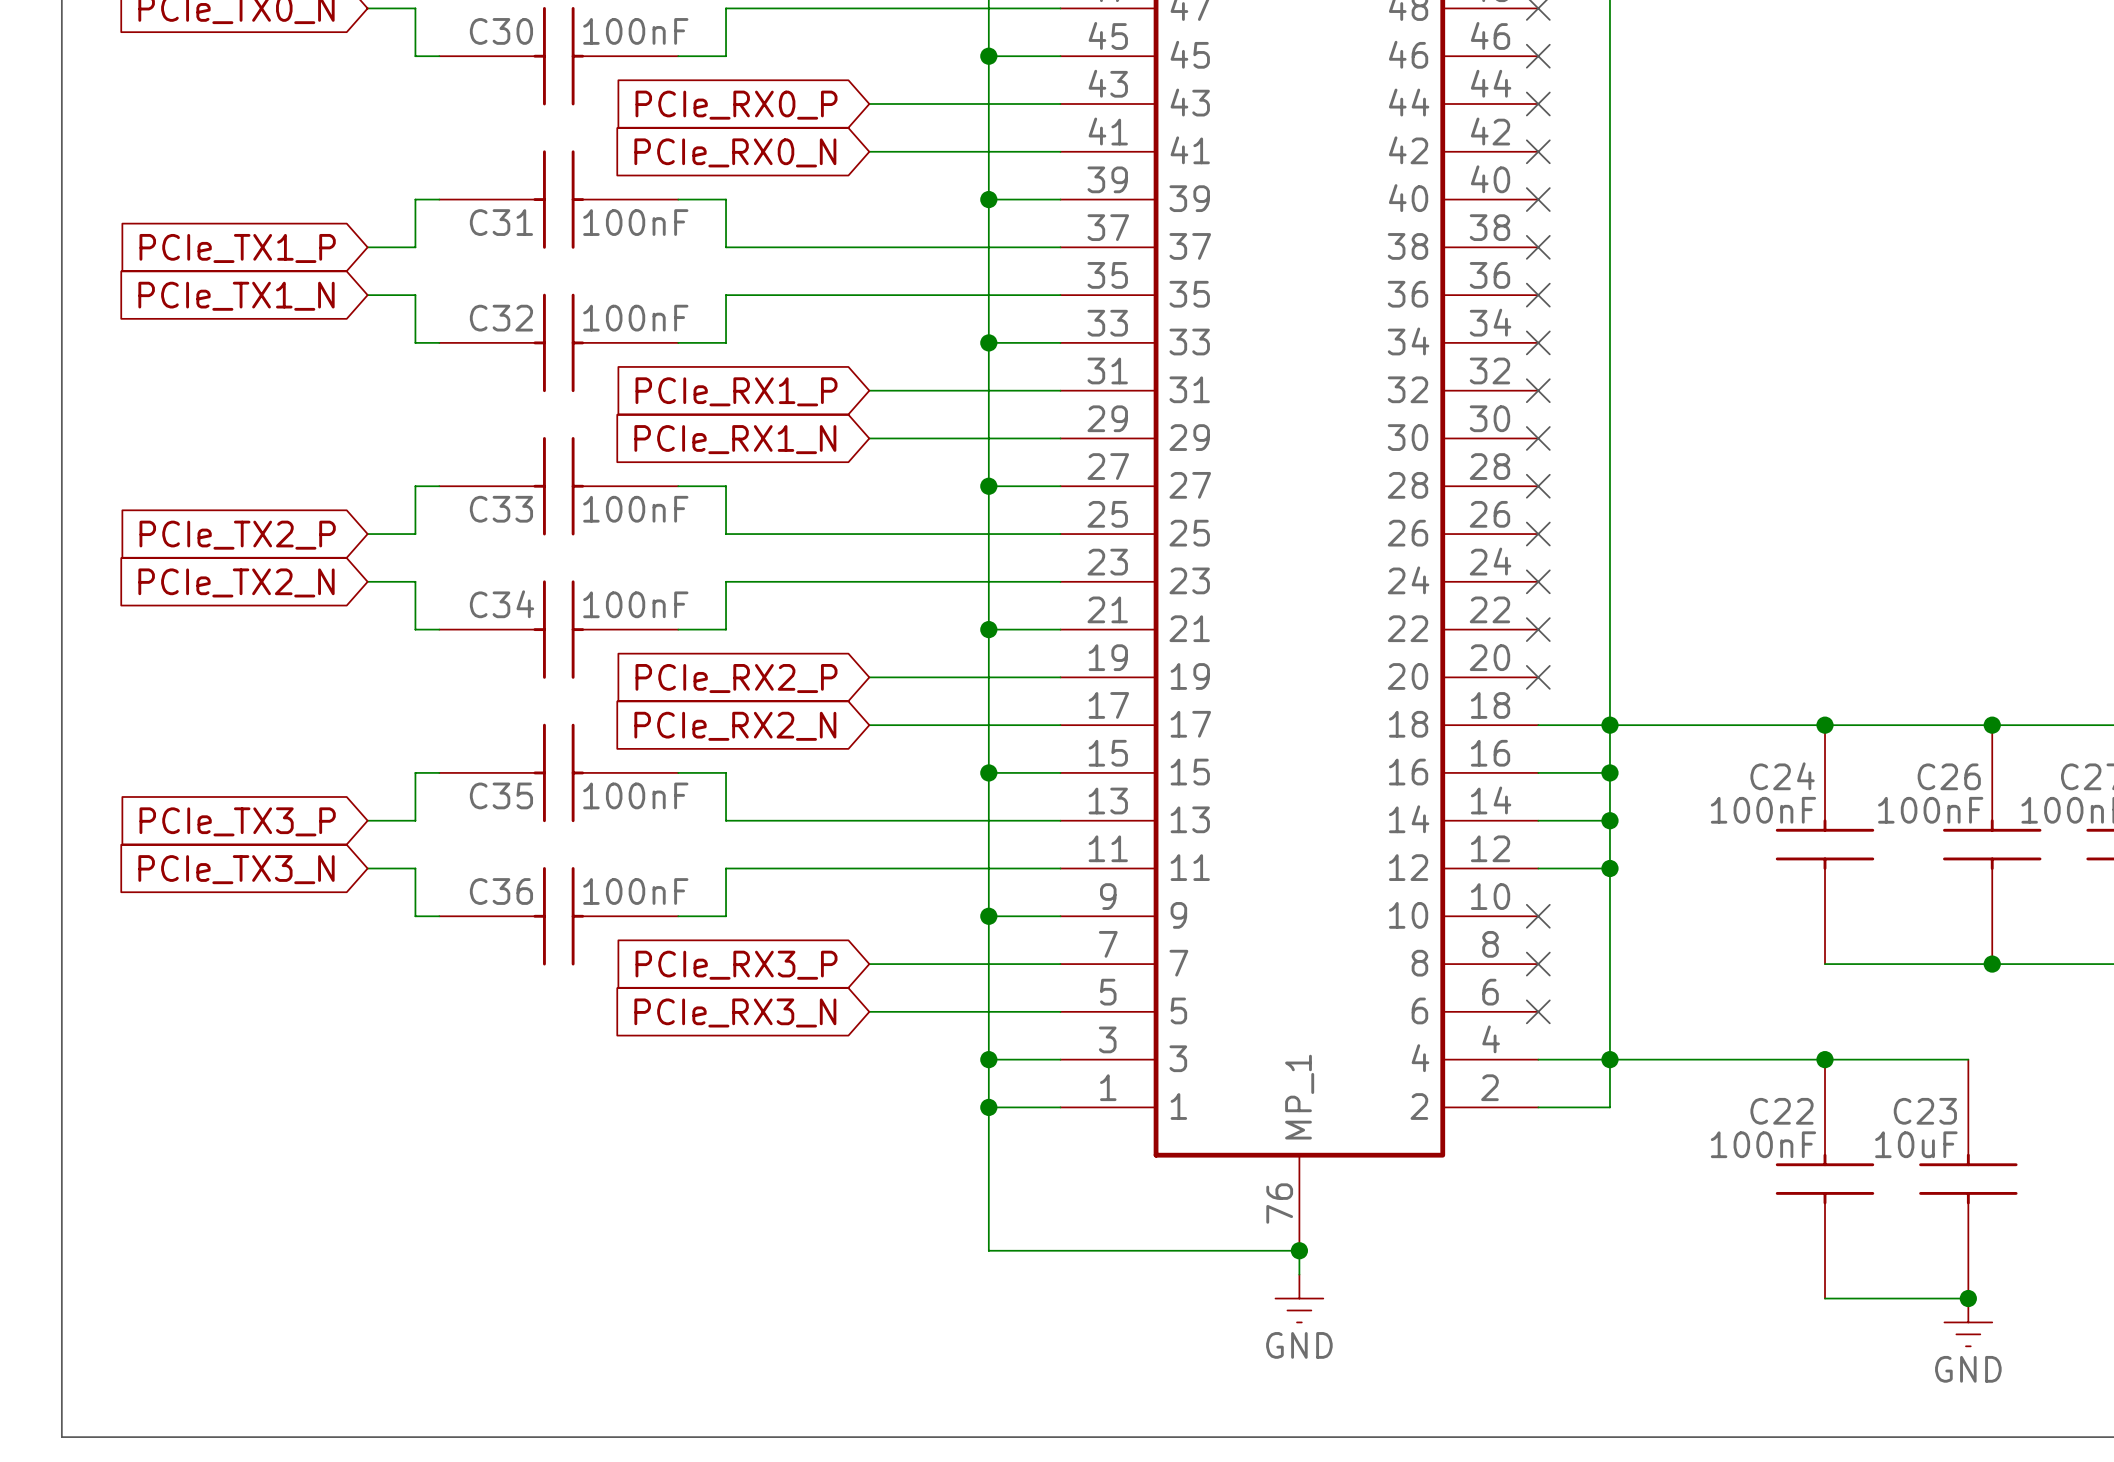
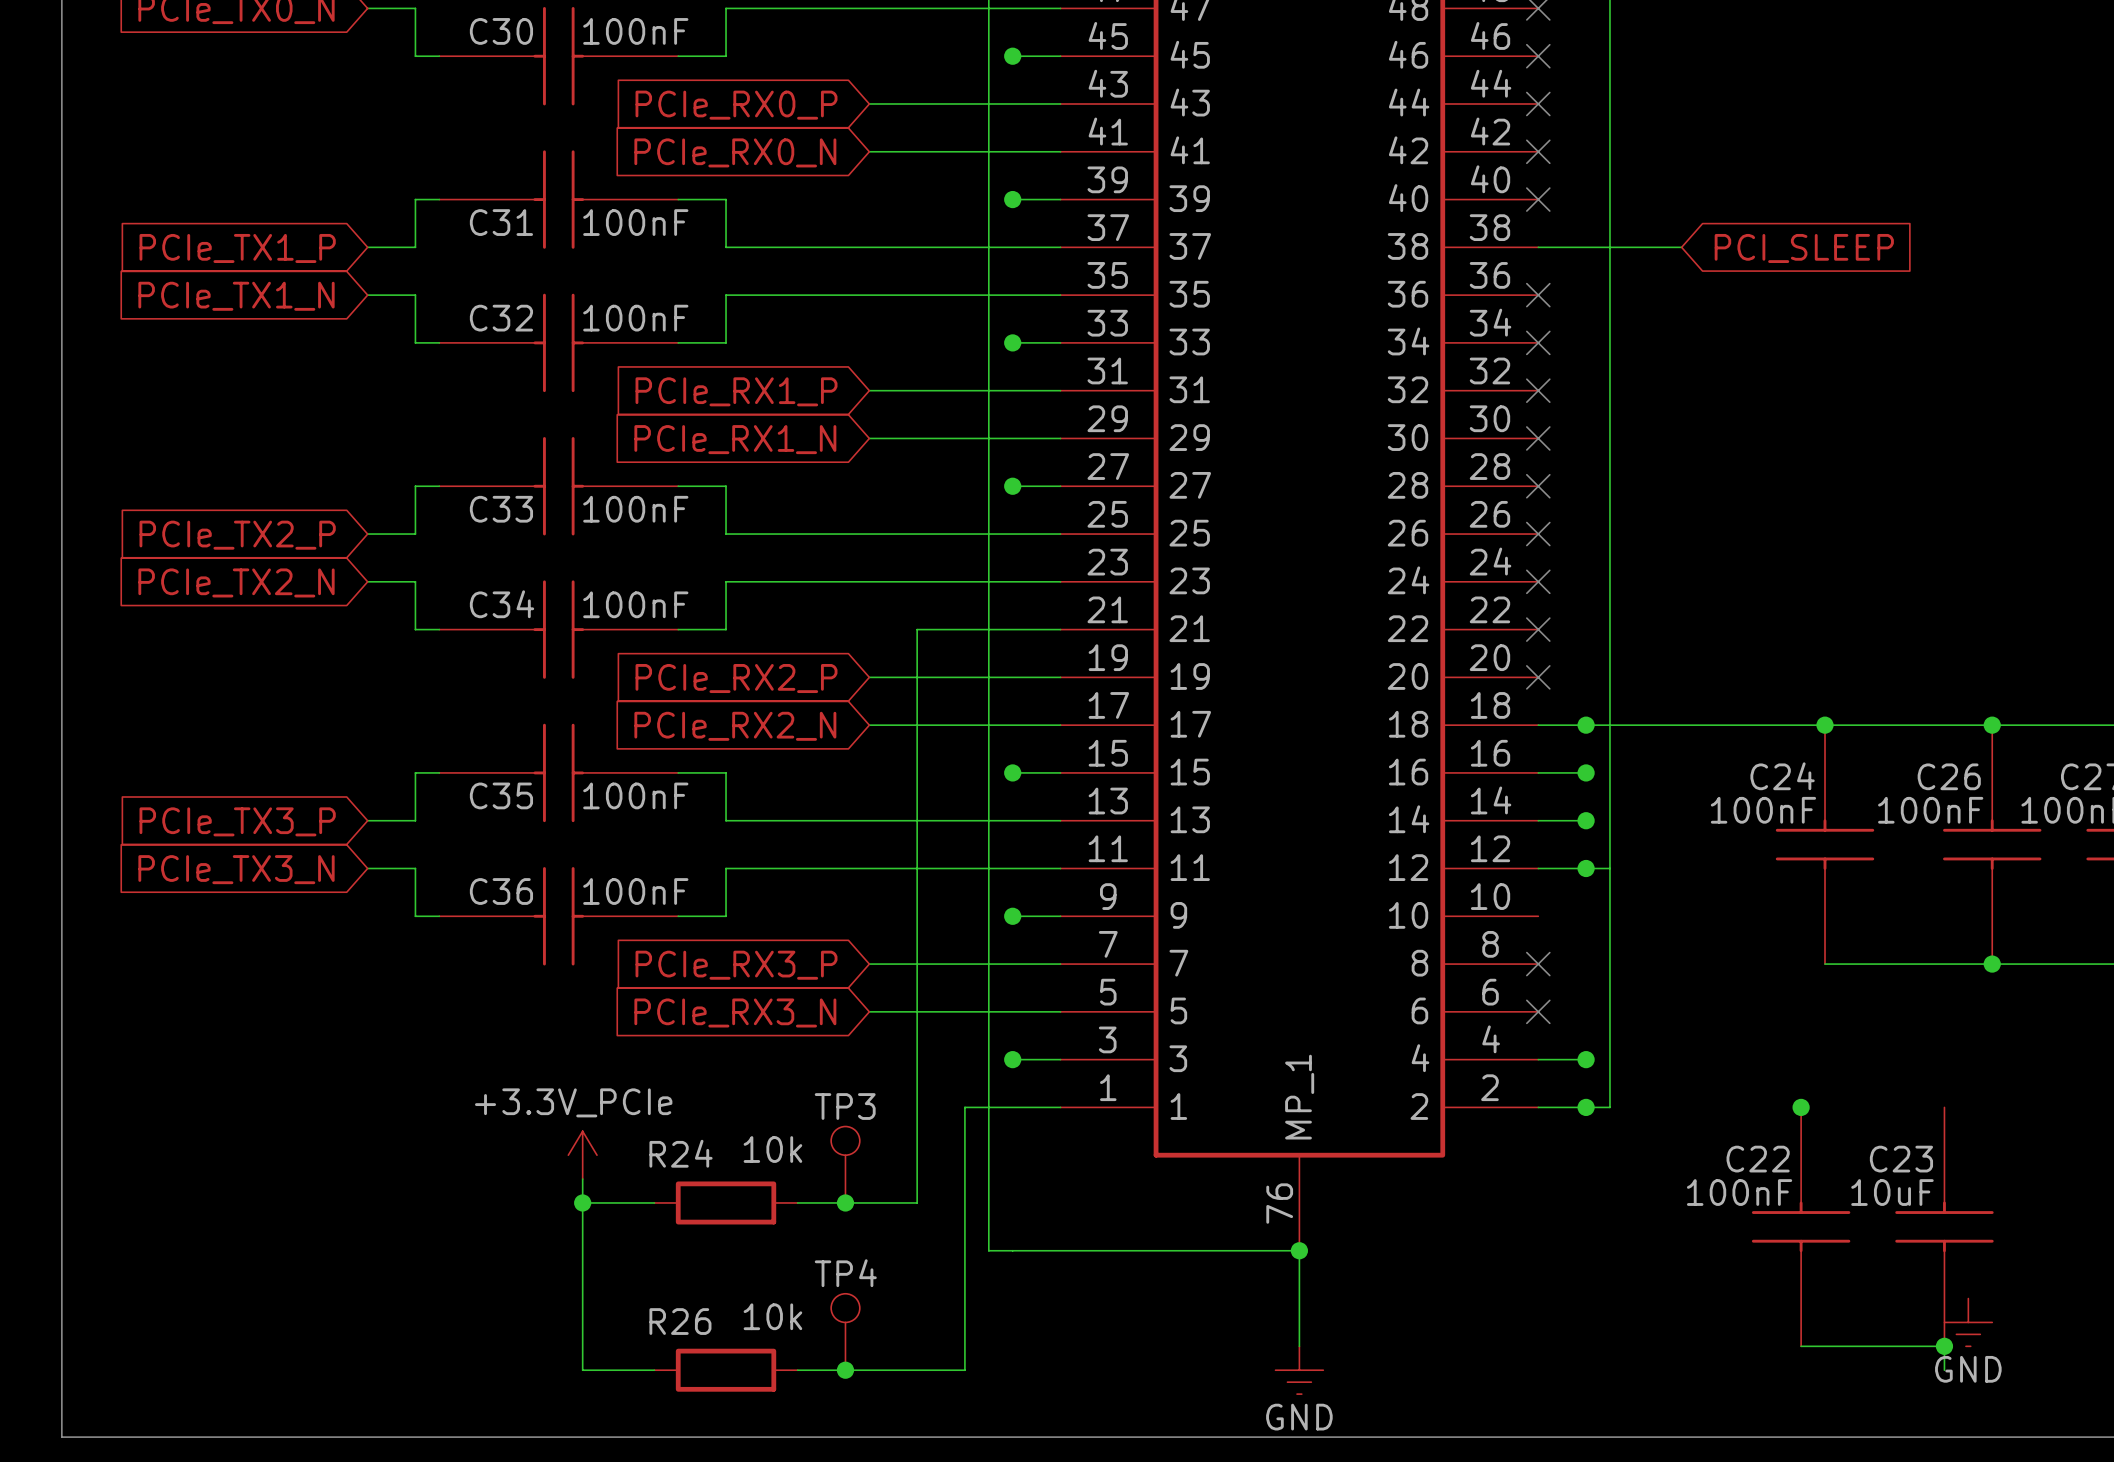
wire: (988, 56) (1012, 56) -> none
junction position: (988, 56) -> (1012, 56)
wire: (988, 199) (1012, 199) -> none
junction position: (988, 199) -> (1012, 199)
wire: none -> (1538, 247) (1681, 247)
no-connect mark: (1538, 247) -> none
global label: none -> PCI_SLEEP (1804, 248)
wire: (988, 342) (1012, 342) -> none
junction position: (988, 342) -> (1012, 342)
wire: (988, 486) (1012, 486) -> none
junction position: (988, 486) -> (1012, 486)
wire: none -> (988, 629) (917, 629) (917, 1202) (797, 1202)
junction: (988, 629) -> none
junction position: (1609, 725) -> (1586, 725)
wire: (988, 772) (1012, 772) -> none
junction position: (988, 772) -> (1012, 772)
wire: (1586, 772) (1609, 772) -> none
junction position: (1609, 772) -> (1586, 772)
wire: (1586, 820) (1609, 820) -> none
junction position: (1609, 820) -> (1586, 820)
junction position: (1609, 868) -> (1586, 868)
wire: (988, 916) (1012, 916) -> none
junction position: (988, 916) -> (1012, 916)
no-connect mark: (1538, 916) -> none
wire: (988, 1059) (1012, 1059) -> none
junction position: (988, 1059) -> (1012, 1059)
wire: (1586, 1059) (1968, 1059) -> none
junction position: (1609, 1059) -> (1586, 1059)
junction position: (1825, 1059) -> (1801, 1107)
wire: none -> (988, 1107) (964, 1107) (964, 1370) (797, 1370)
junction: (988, 1107) -> none
junction: none -> (1586, 1107)
power symbol: none -> +3.3V_PCIe (582, 1155)
TP3: none -> (845, 1164)
wire: none -> (582, 1179) (582, 1370) (654, 1370)
C22 position: (1825, 1179) -> (1801, 1226)
C23 position: (1968, 1179) -> (1944, 1226)
wire: none -> (582, 1202) (654, 1202)
junction: none -> (582, 1202)
R24: none -> 10k (726, 1202)
junction: none -> (845, 1202)
wire: none -> (1299, 1274) (1299, 1346)
power symbol position: GND (1299, 1298) -> GND (1299, 1370)
wire: (1825, 1298) (1968, 1298) -> none
junction position: (1968, 1298) -> (1944, 1346)
TP4: none -> (845, 1331)
wire: none -> (1801, 1346) (1944, 1346) (1944, 1370)
R26: none -> 10k (726, 1370)
junction: none -> (845, 1370)

